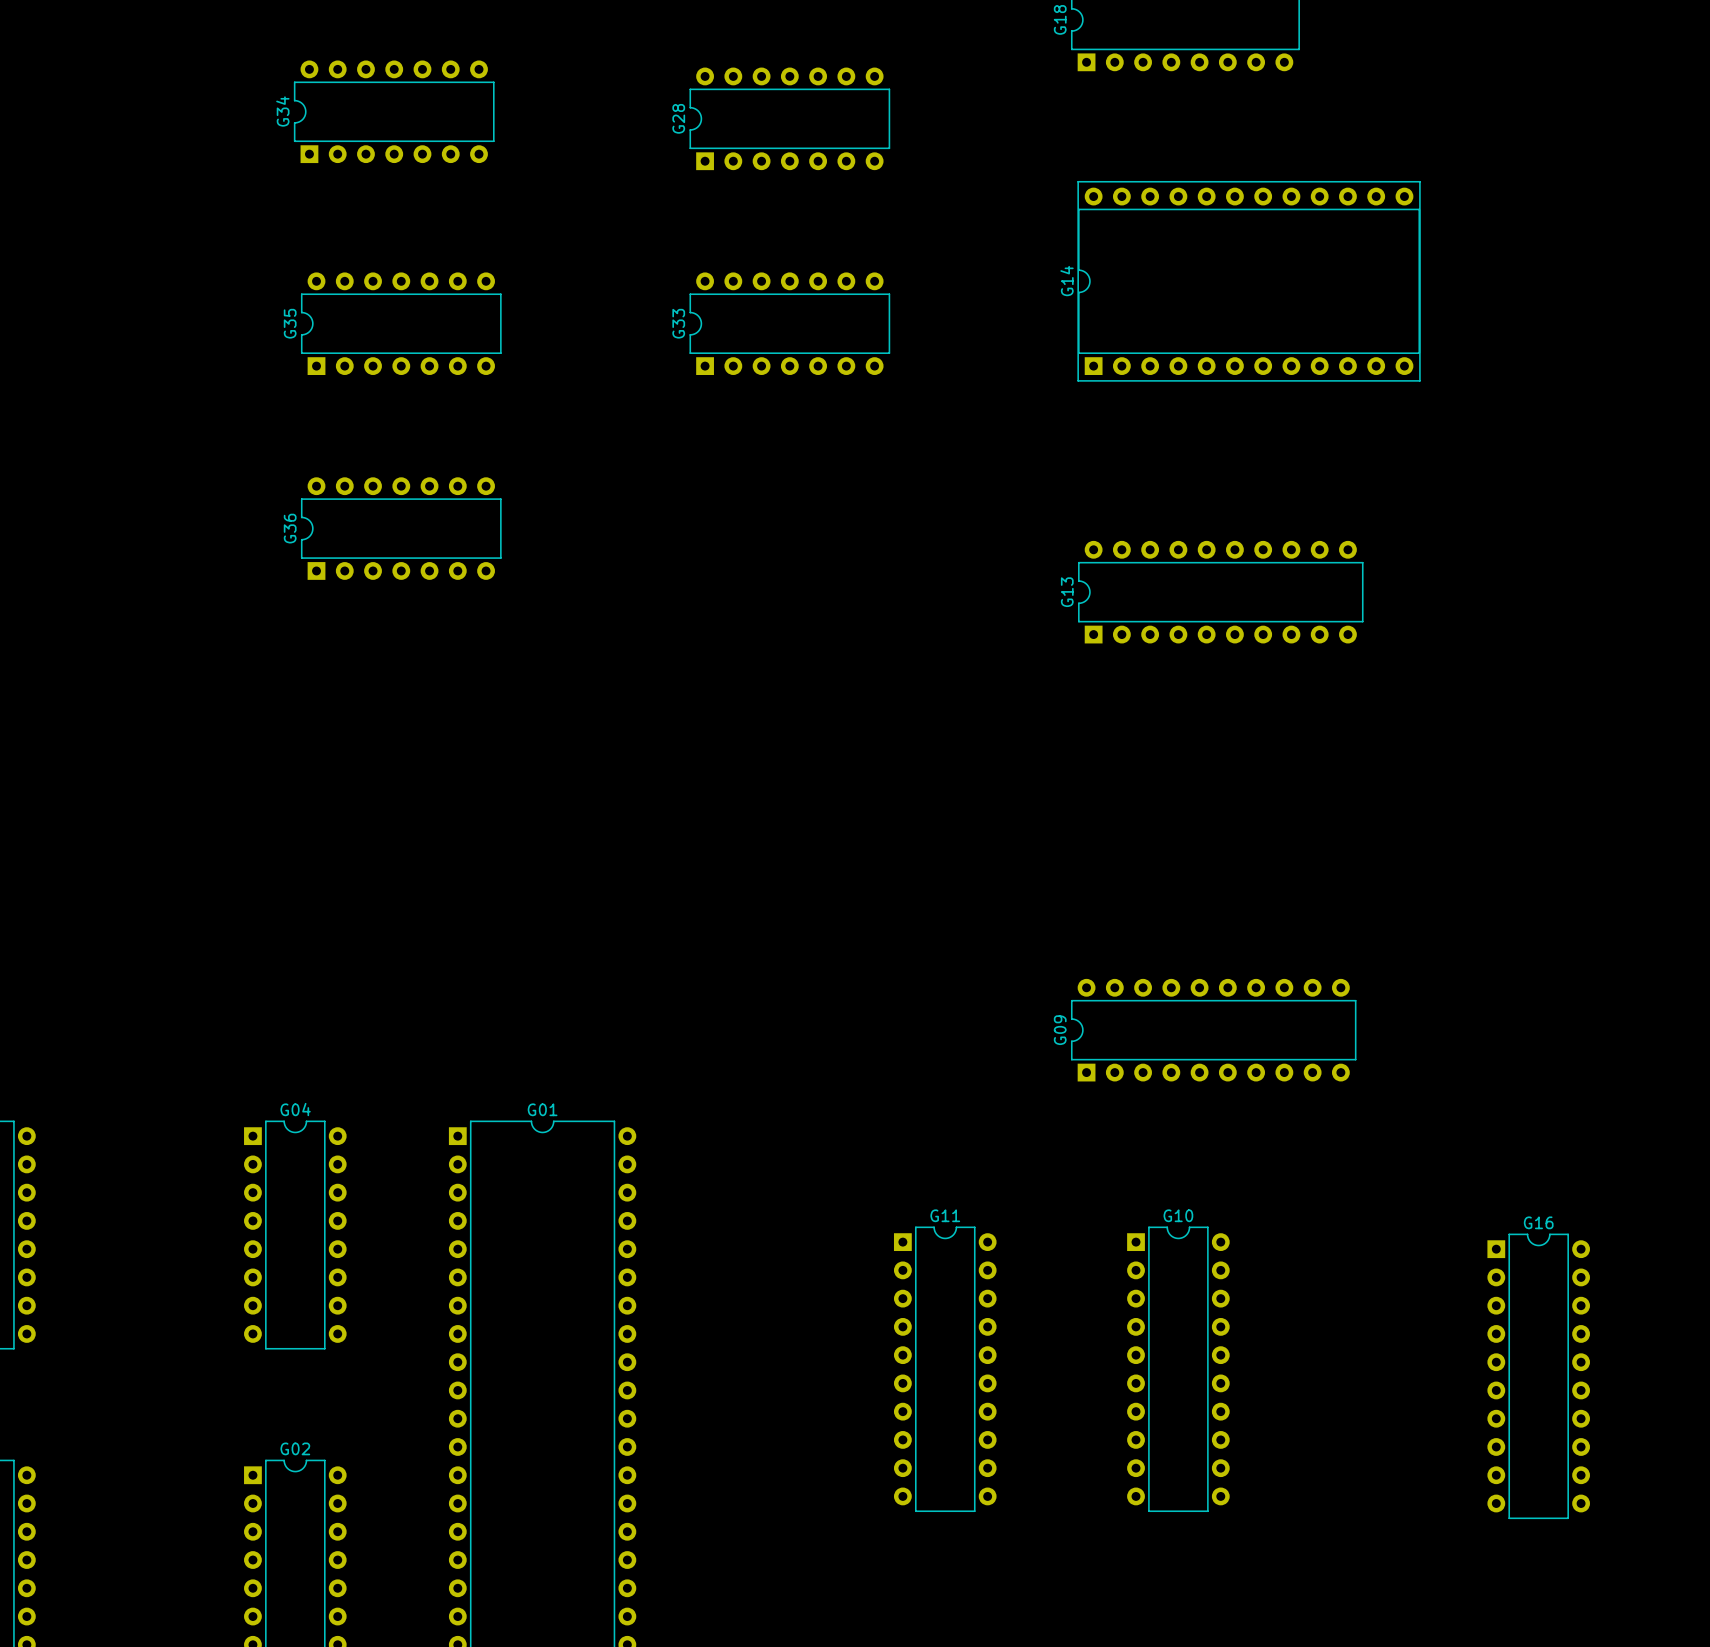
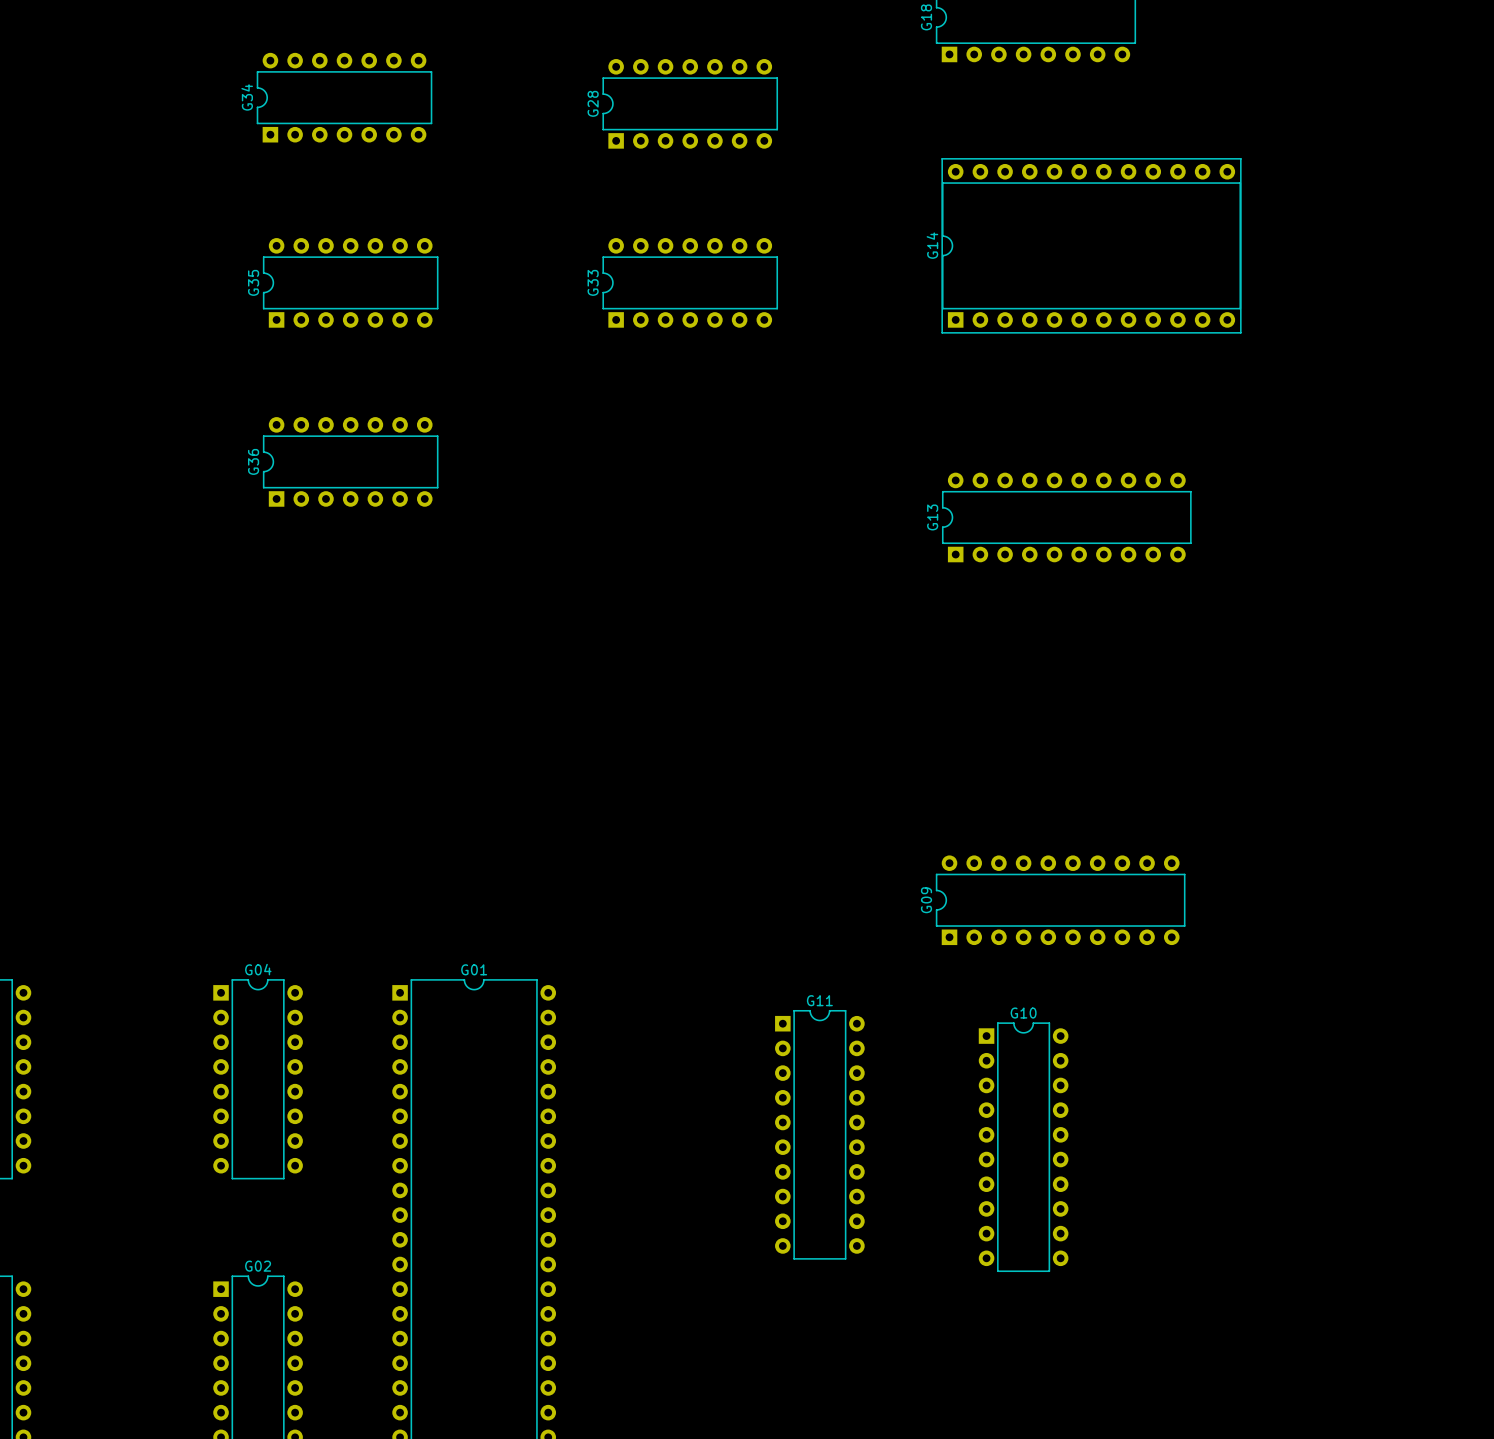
G11 position: (945, 1369) -> (819, 1134)
G10 position: (1178, 1369) -> (1023, 1147)
G16: (1538, 1376) -> none

